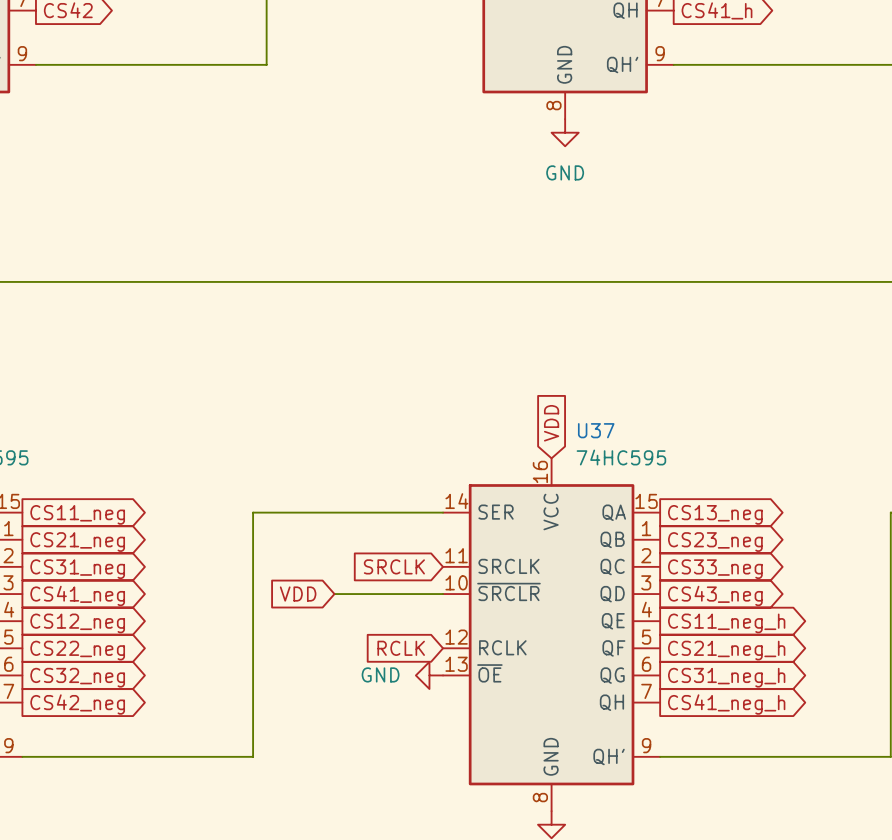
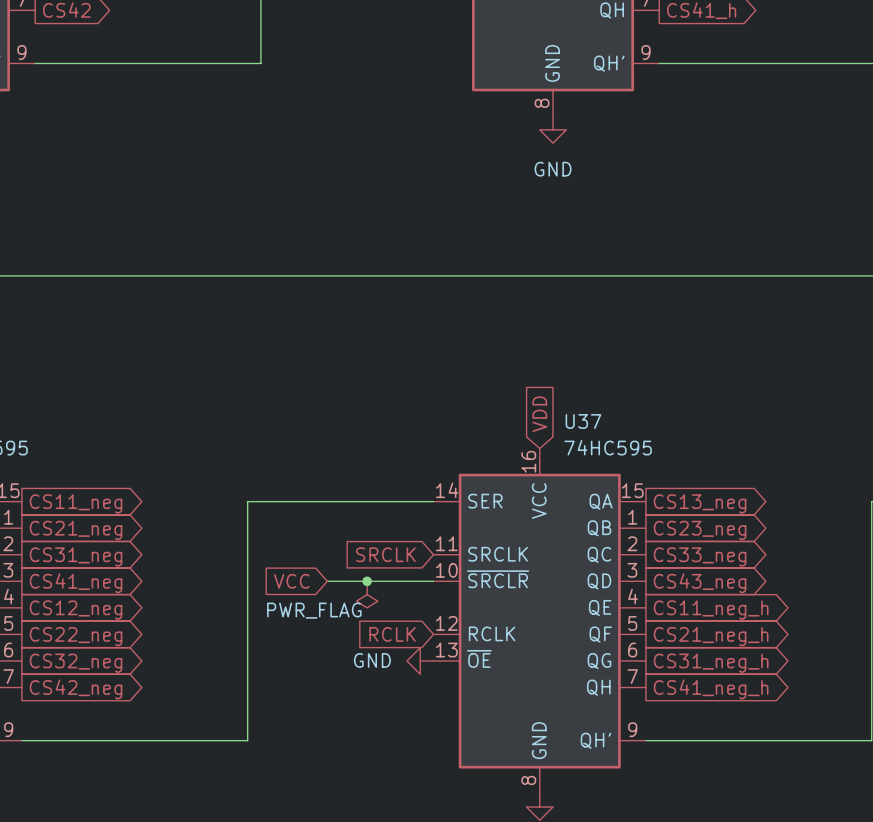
global label: VDD (298, 594) -> VCC (291, 581)
junction: none -> (367, 581)
power symbol: none -> PWR_FLAG (367, 594)

